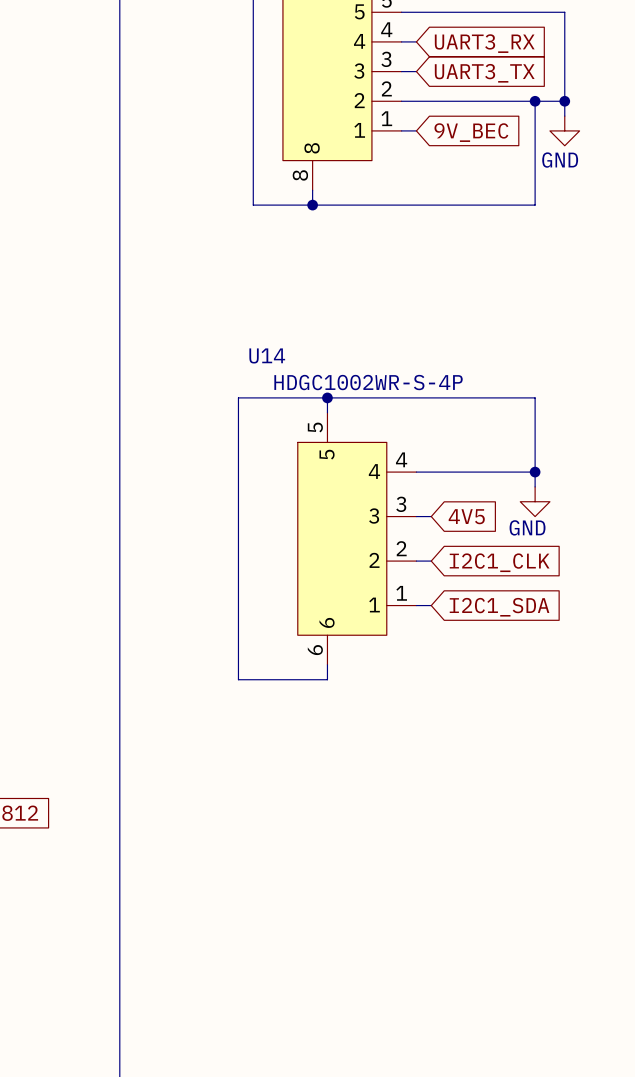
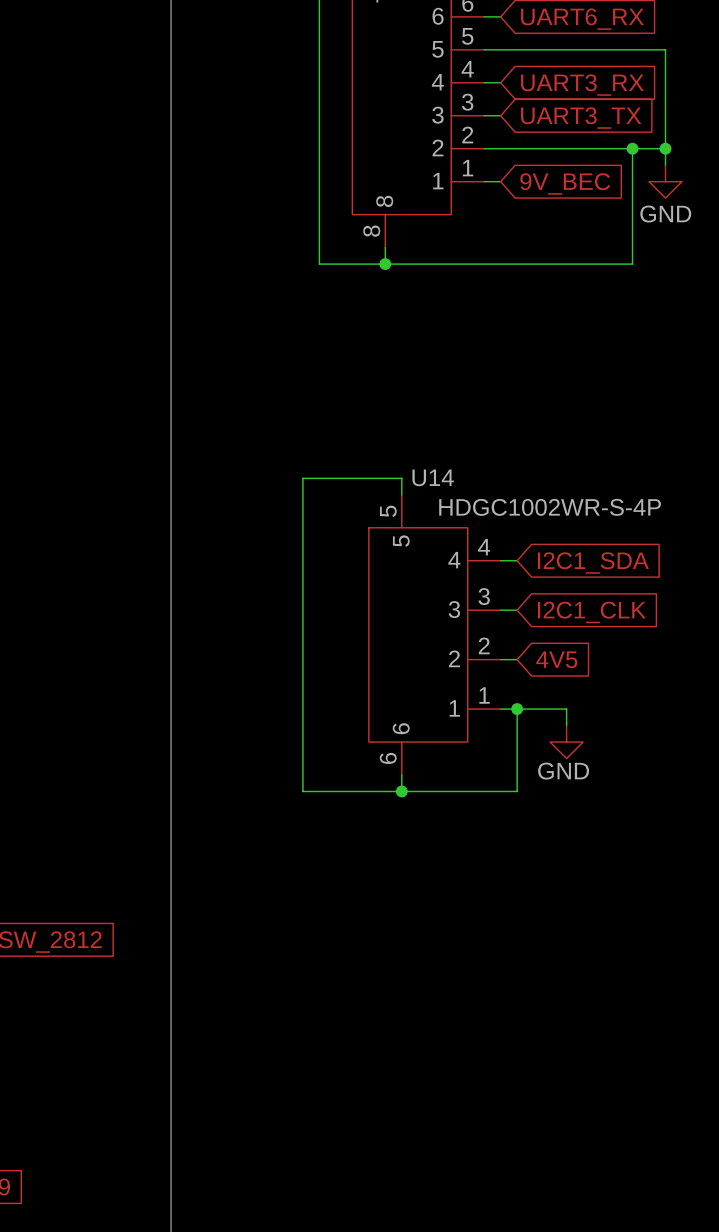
U14 name position: U14 (267, 355) -> U14 (433, 477)
U14 value position: HDGC1002WR-S-4P (368, 382) -> HDGC1002WR-S-4P (550, 507)
wire: (327, 397) (535, 397) (535, 486) -> none
junction: (327, 397) -> none
wire: (431, 472) (535, 472) -> none
junction: (535, 472) -> none
power symbol position: GND (535, 501) -> GND (566, 742)
global label: 4V5 (466, 516) -> I2C1_CLK (591, 612)
global label: I2C1_CLK (499, 562) -> 4V5 (556, 659)
junction: none -> (517, 709)
global label position: I2C1_SDA (499, 607) -> I2C1_SDA (593, 563)
wire: none -> (566, 725) (566, 709) (517, 709) (517, 791) (401, 791)
junction: none -> (401, 791)

